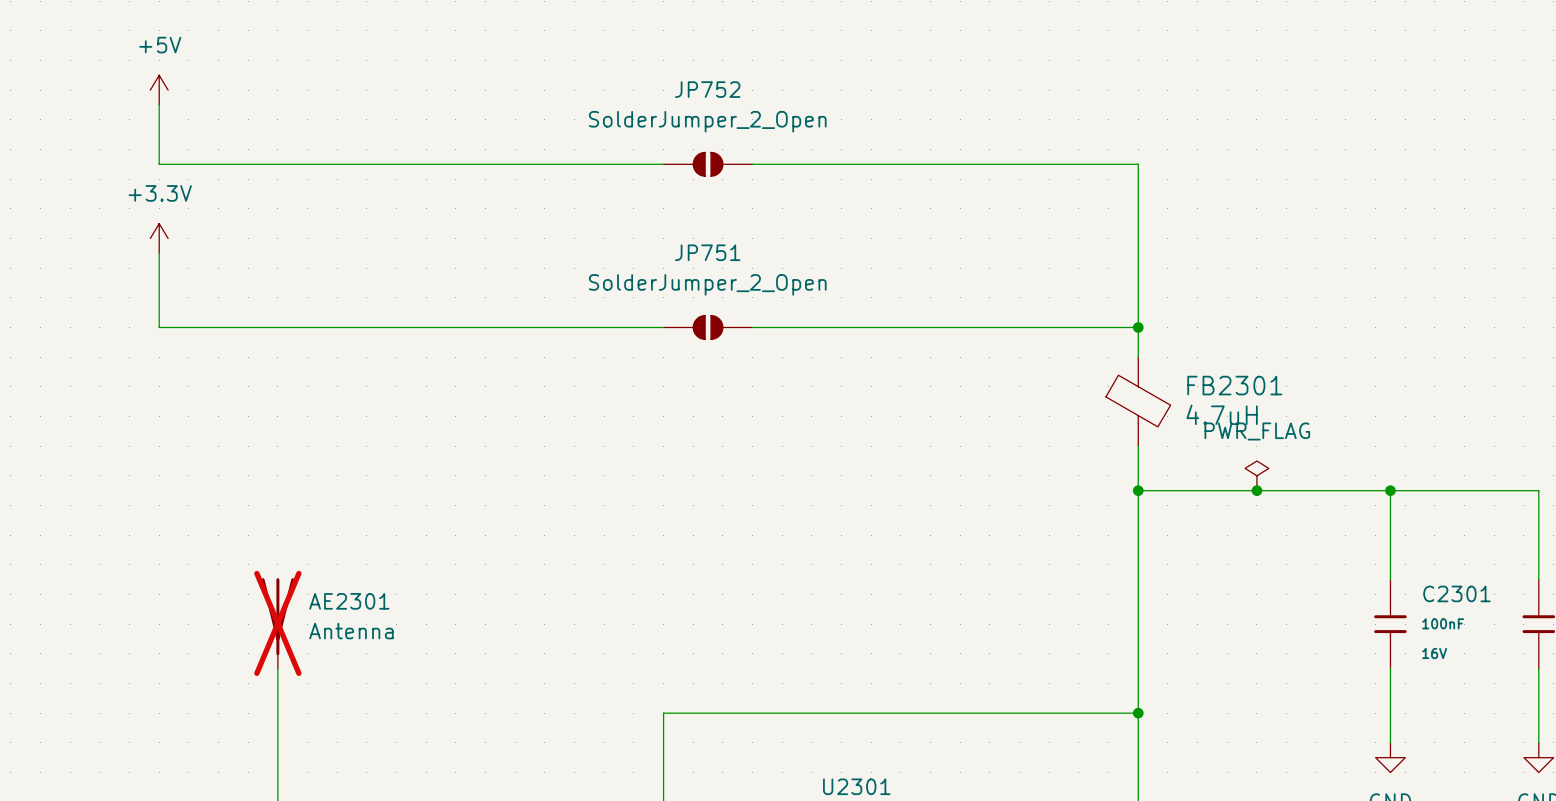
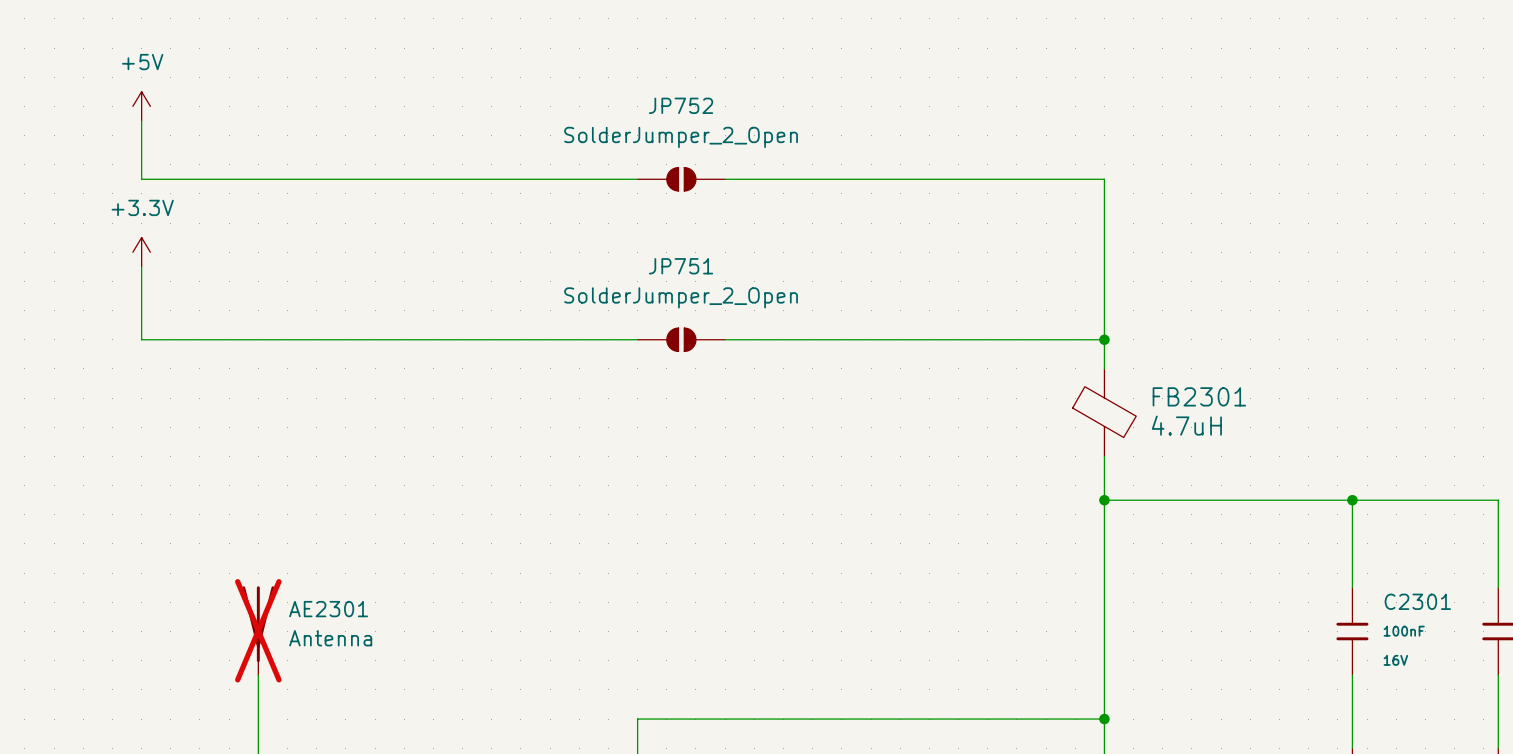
power symbol: PWR_FLAG (1256, 475) -> none
junction: (1256, 490) -> none

